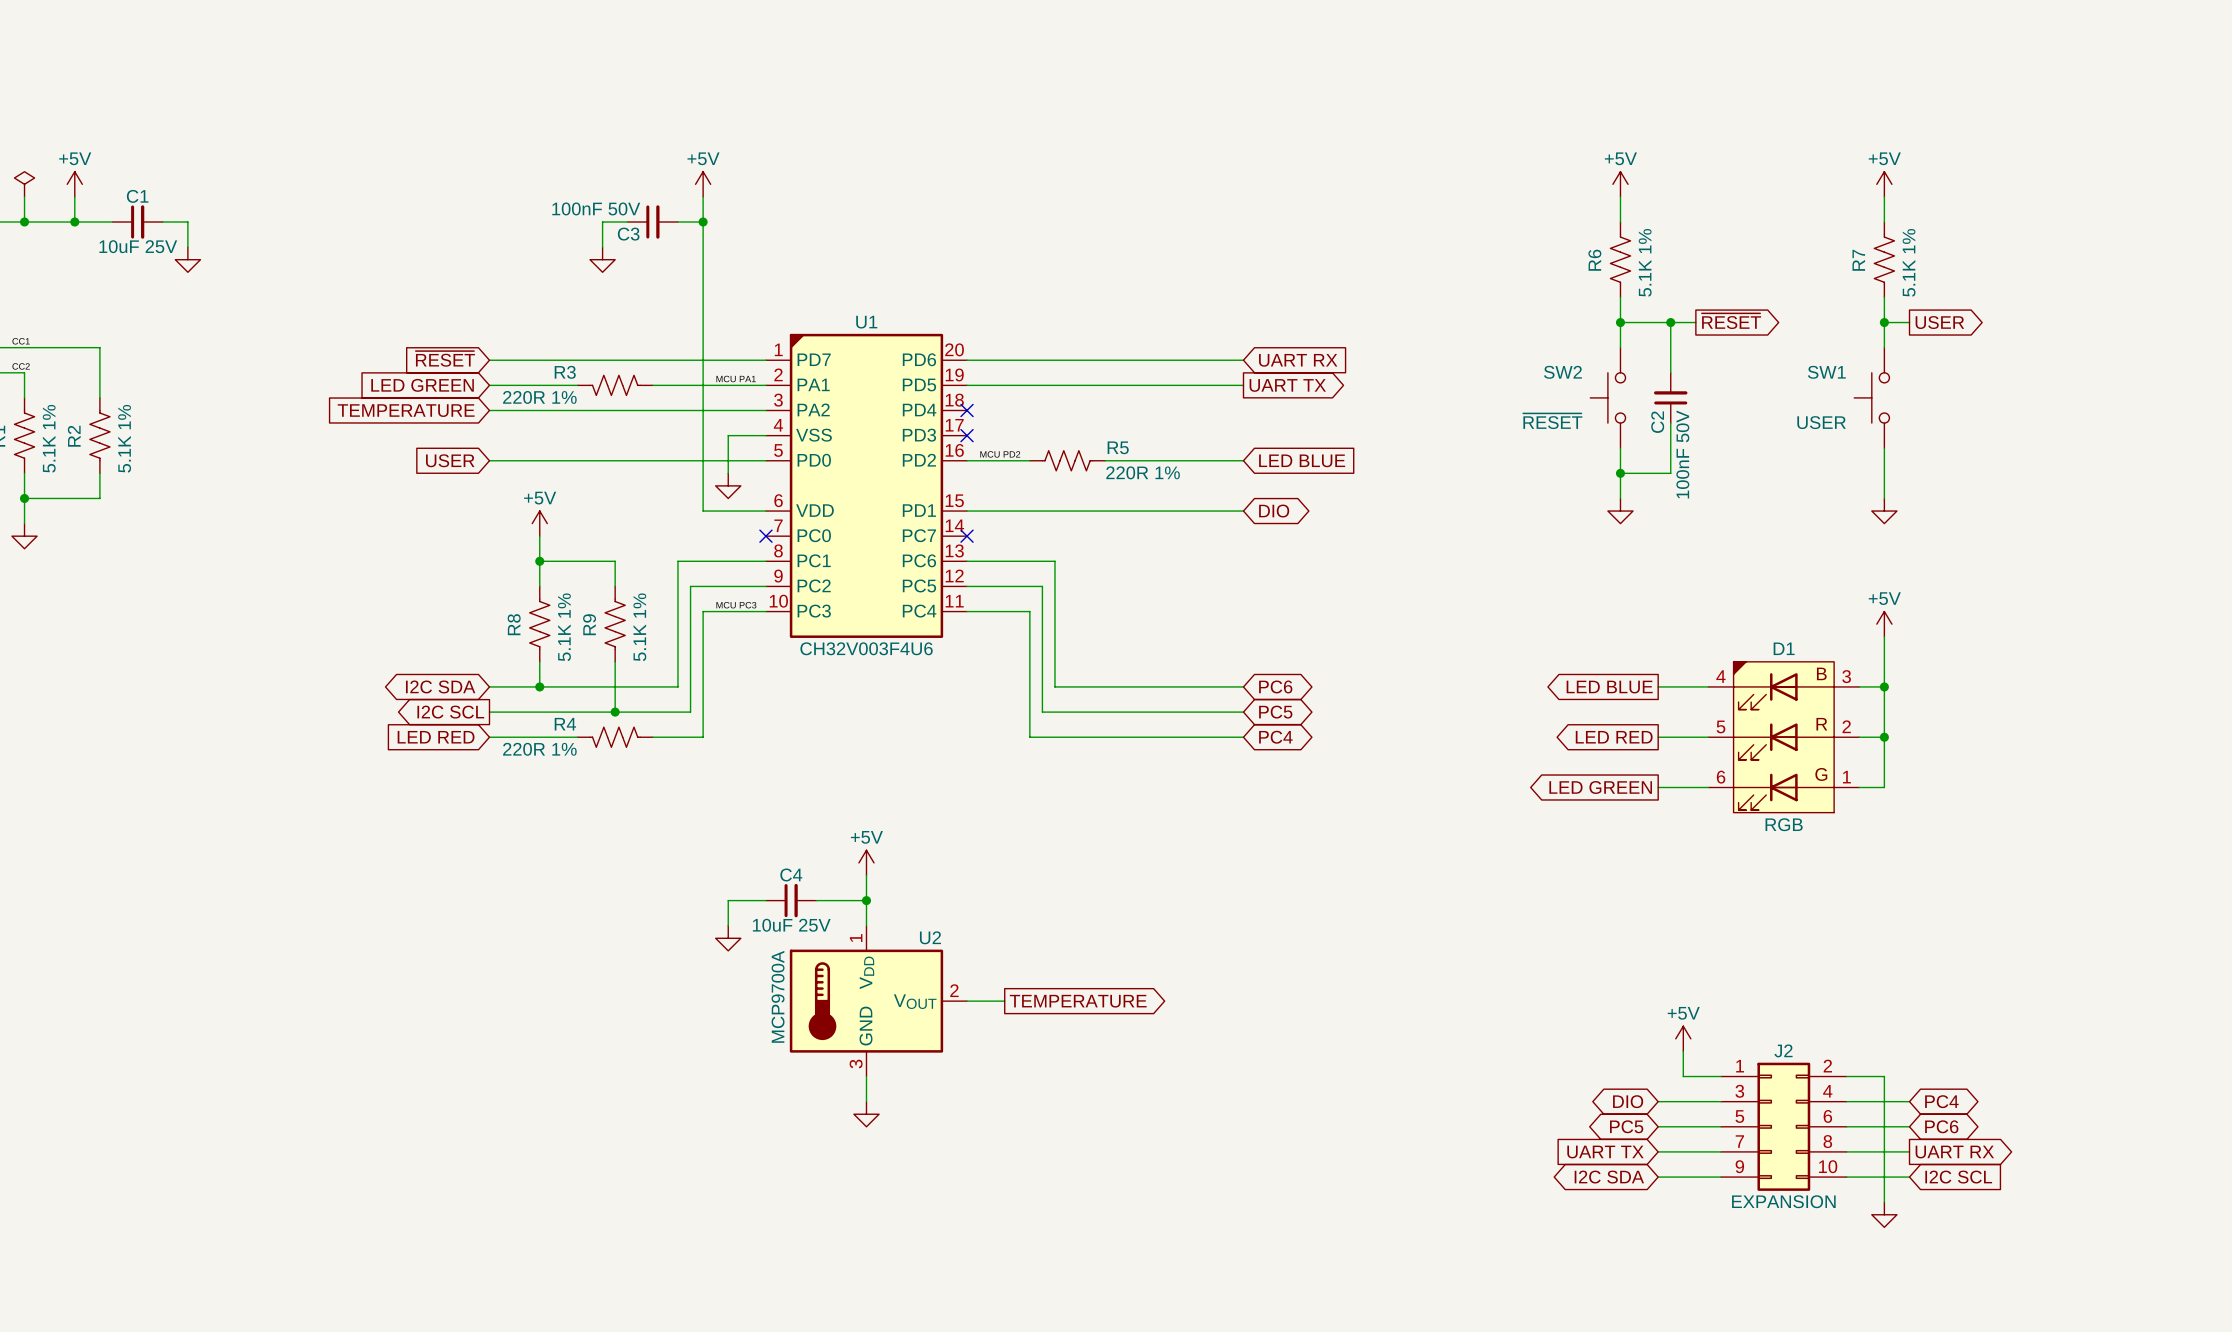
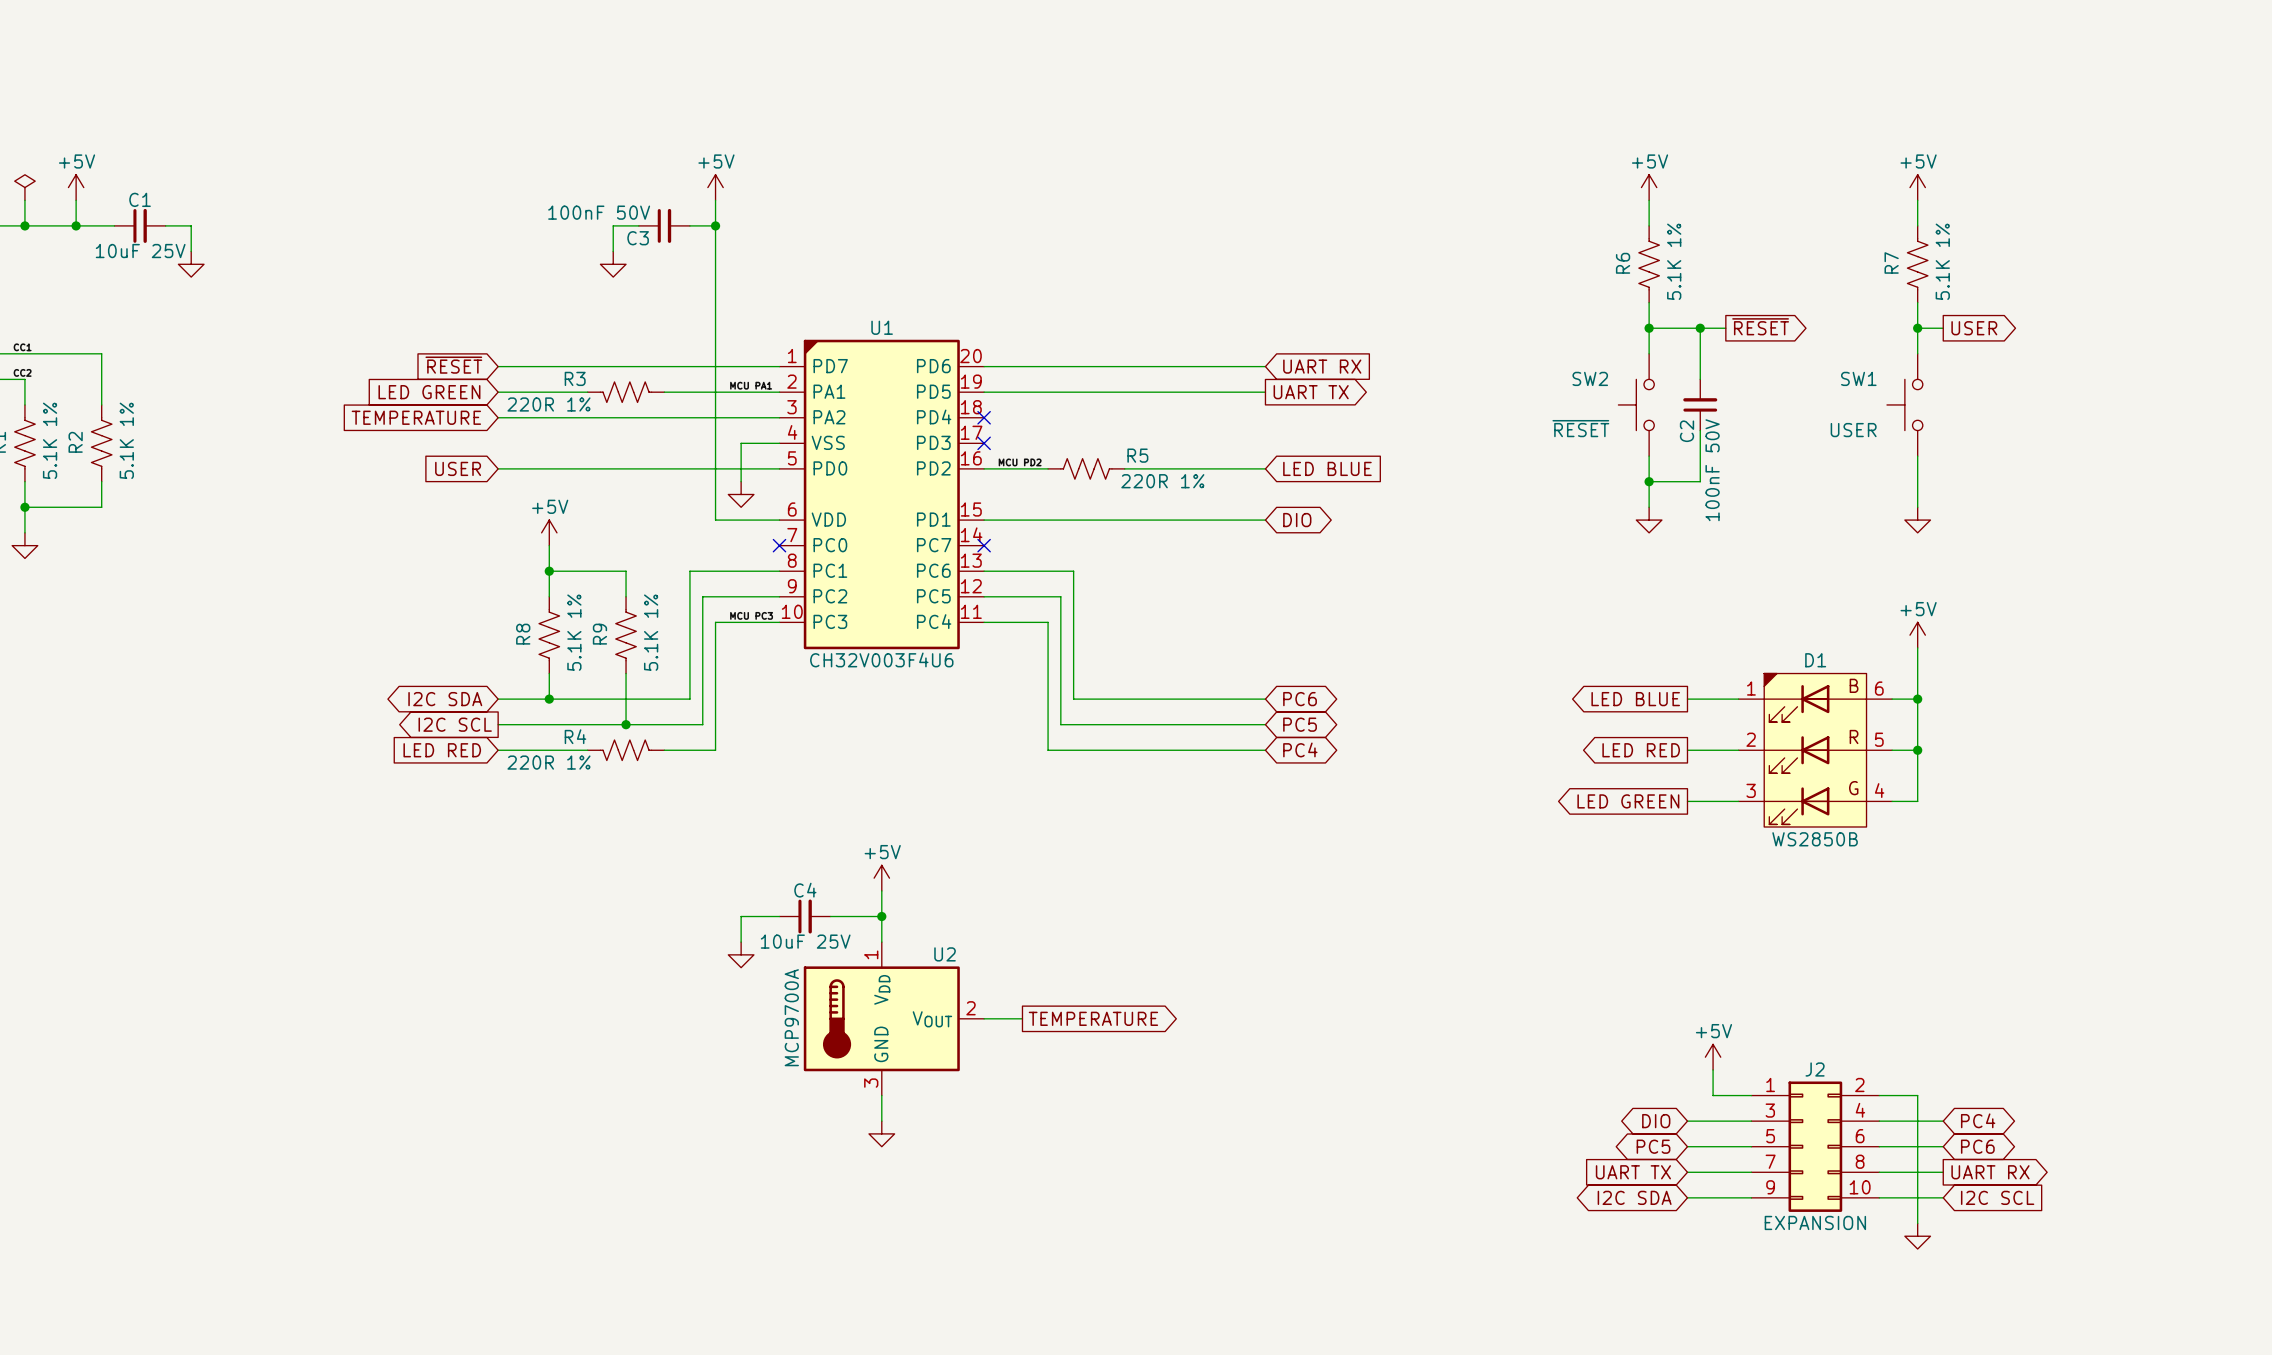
D1 symbol: [1708, 661, 1860, 813] -> [1738, 673, 1893, 827]
D1 value: RGB (1784, 824) -> WS2850B (1815, 839)

